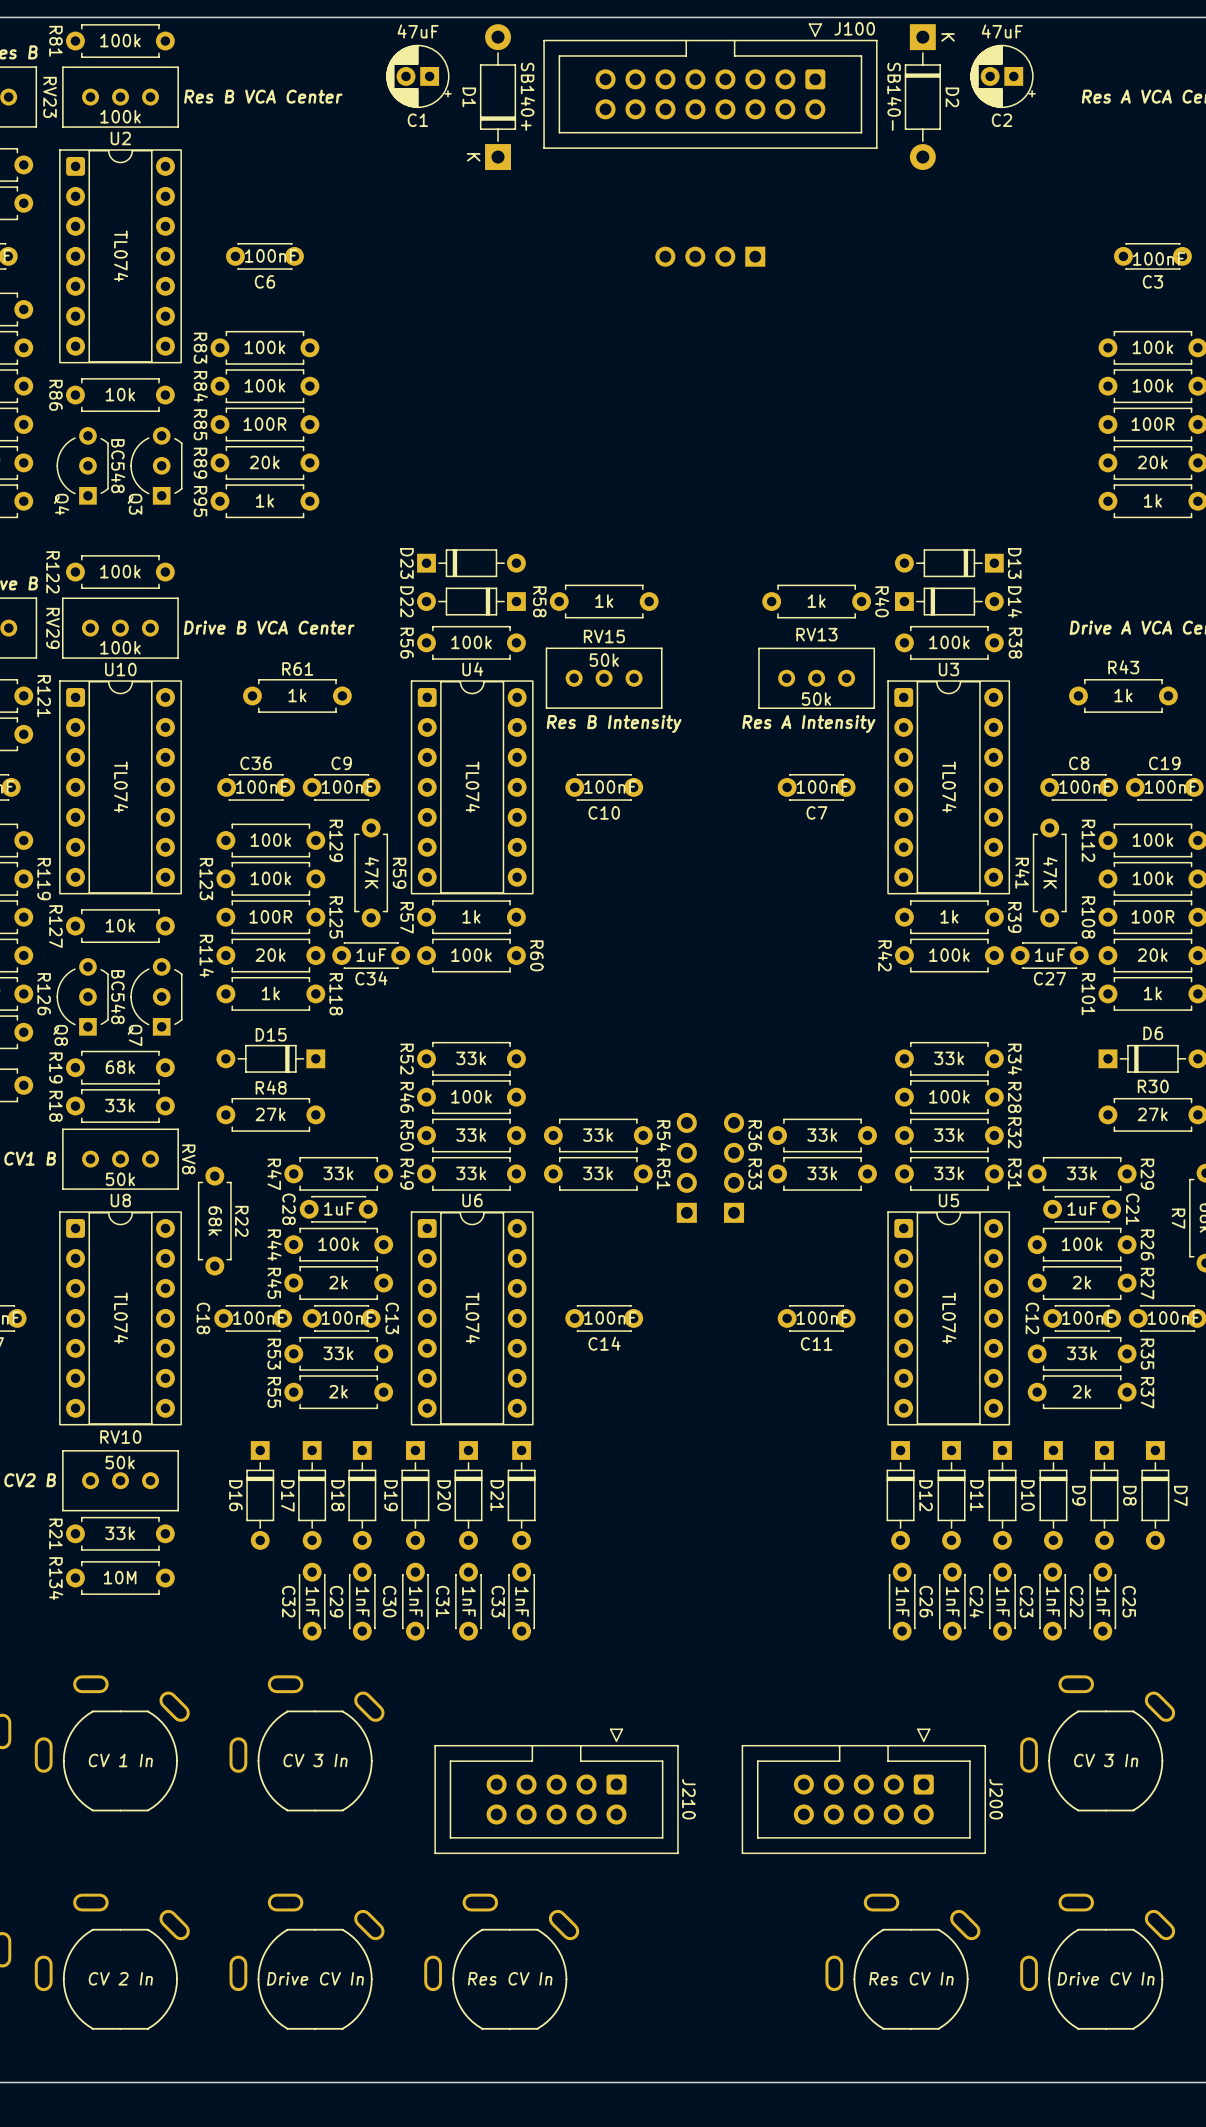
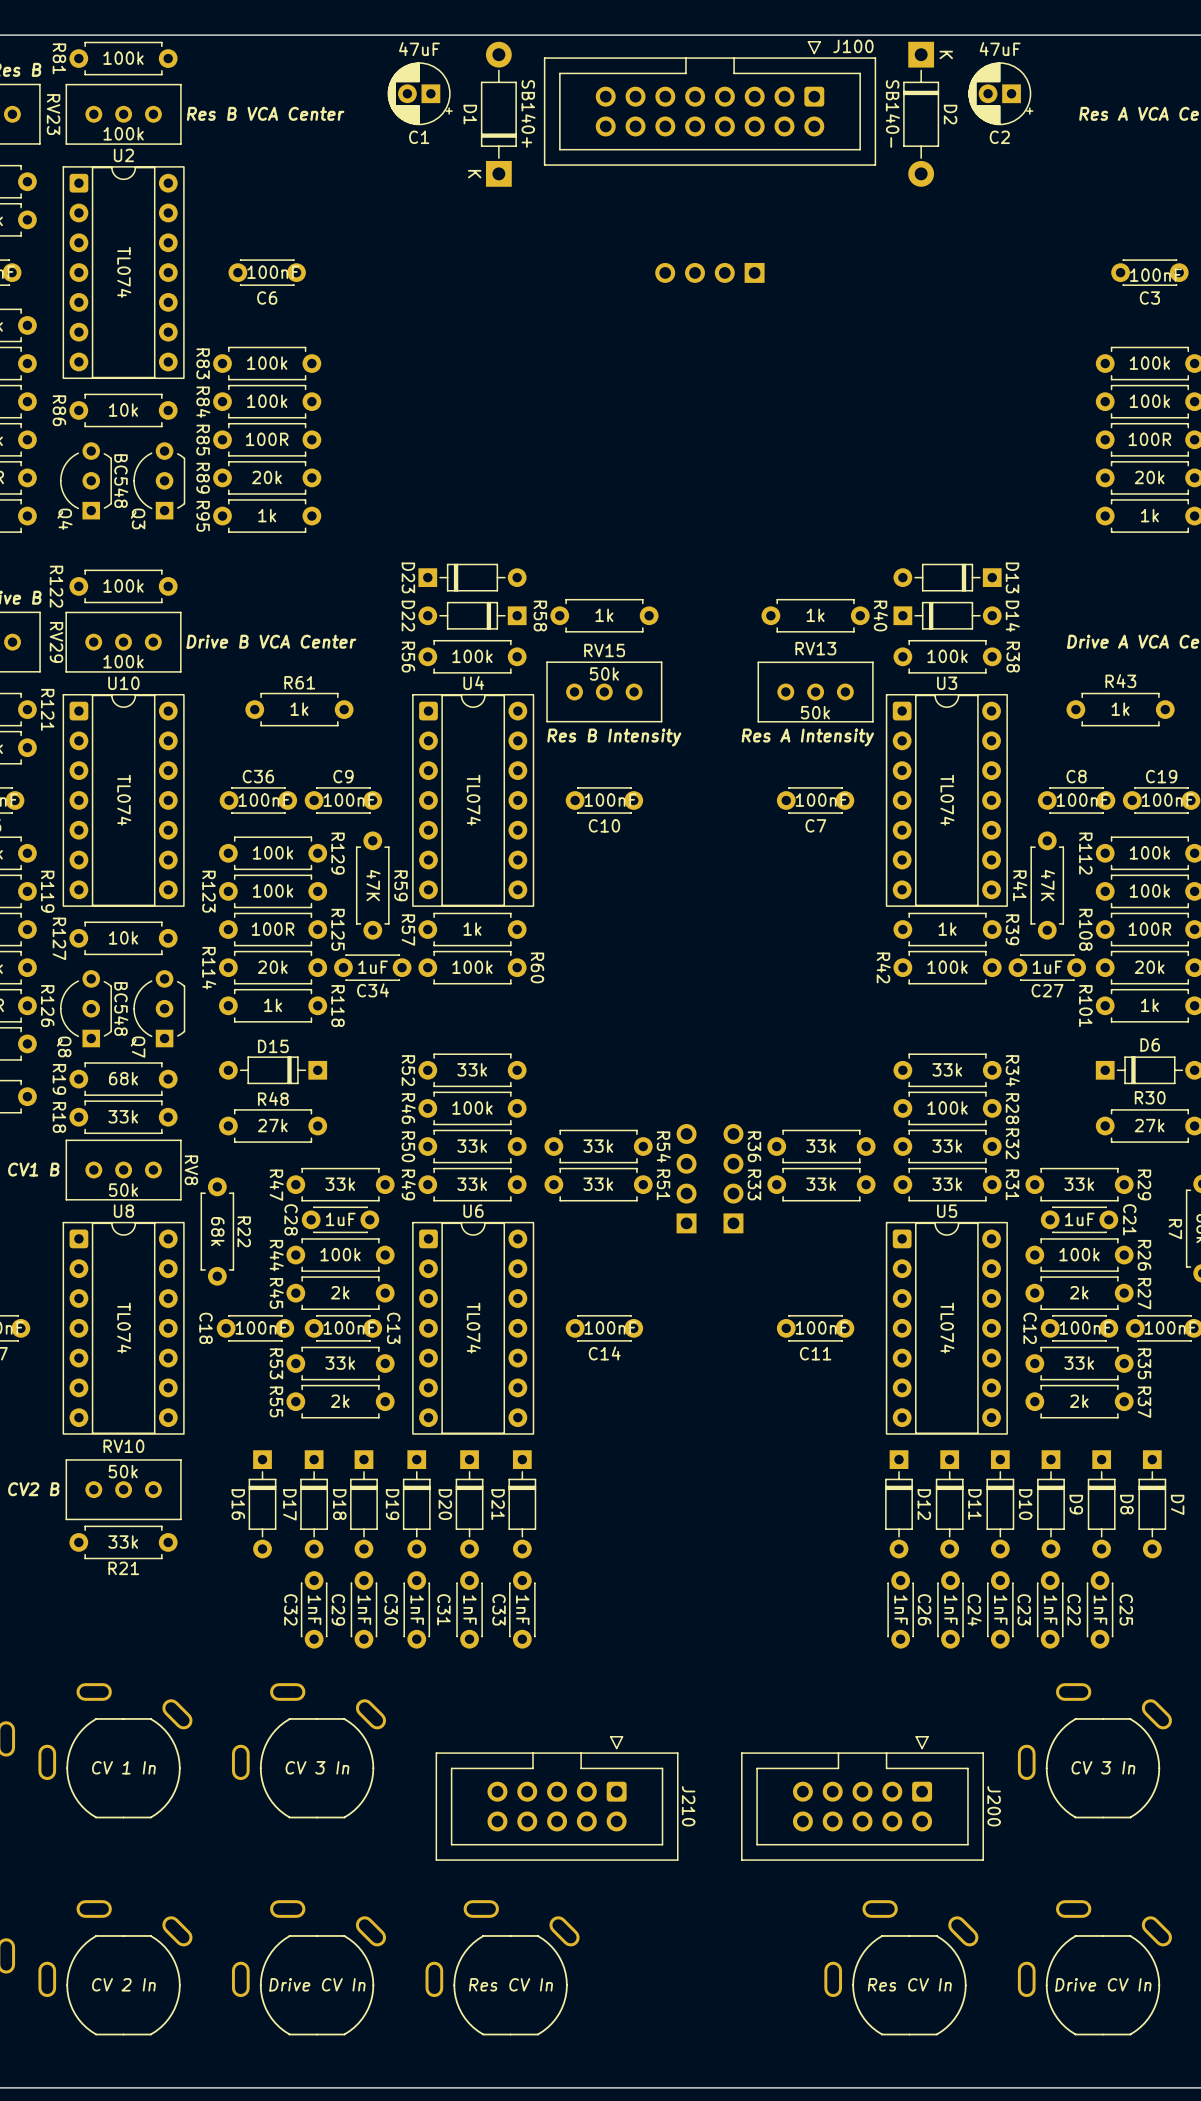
R21 name rotation: 0° (55, 1534) -> 90° counterclockwise (123, 1568)
R21 name position: R21 (55, 1534) -> R21 (123, 1568)
R134: 10M (120, 1578) -> none

